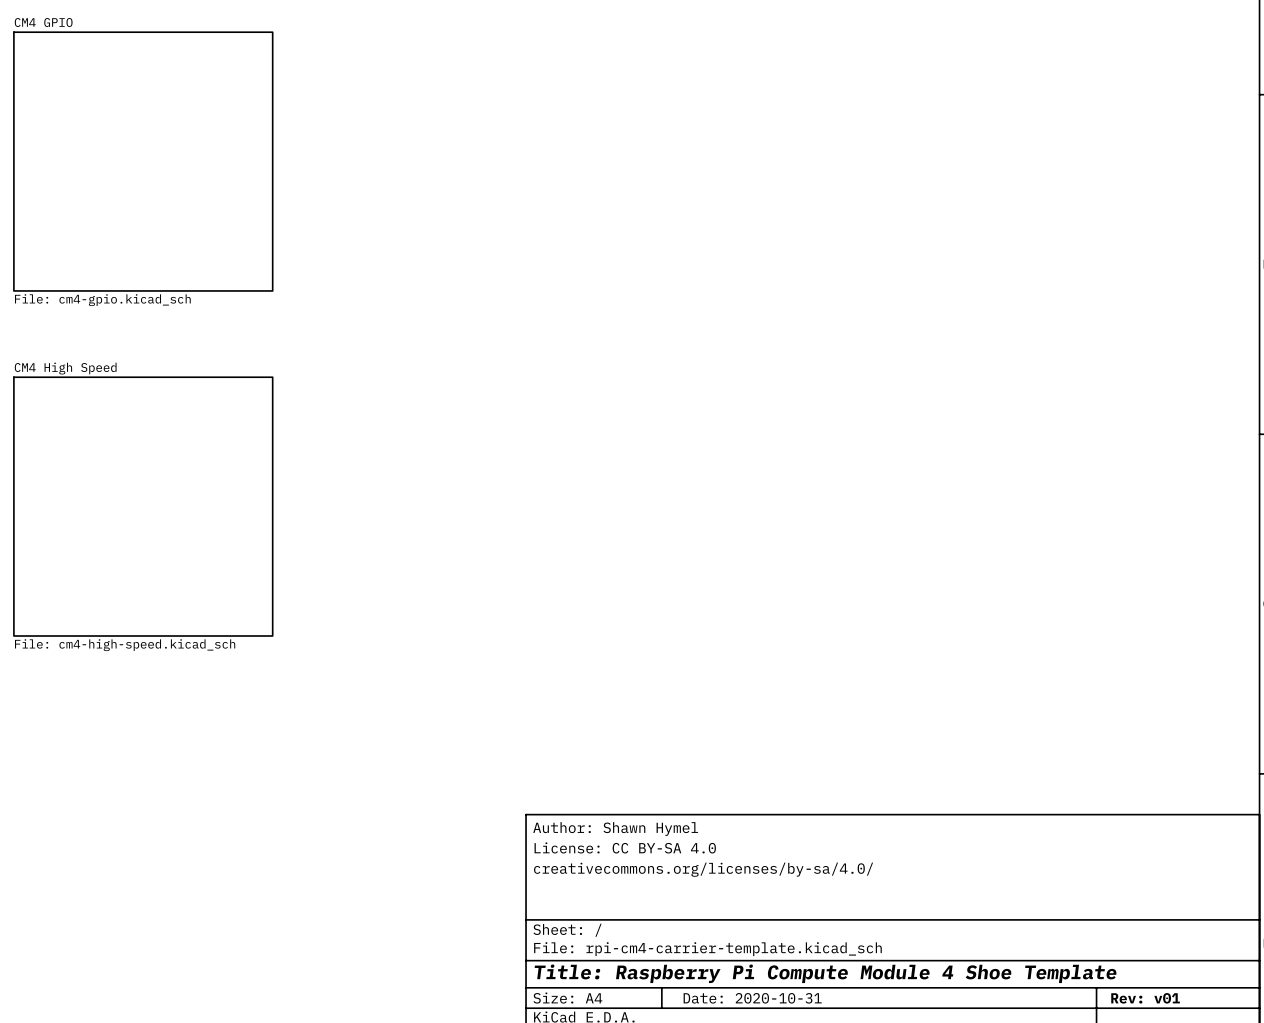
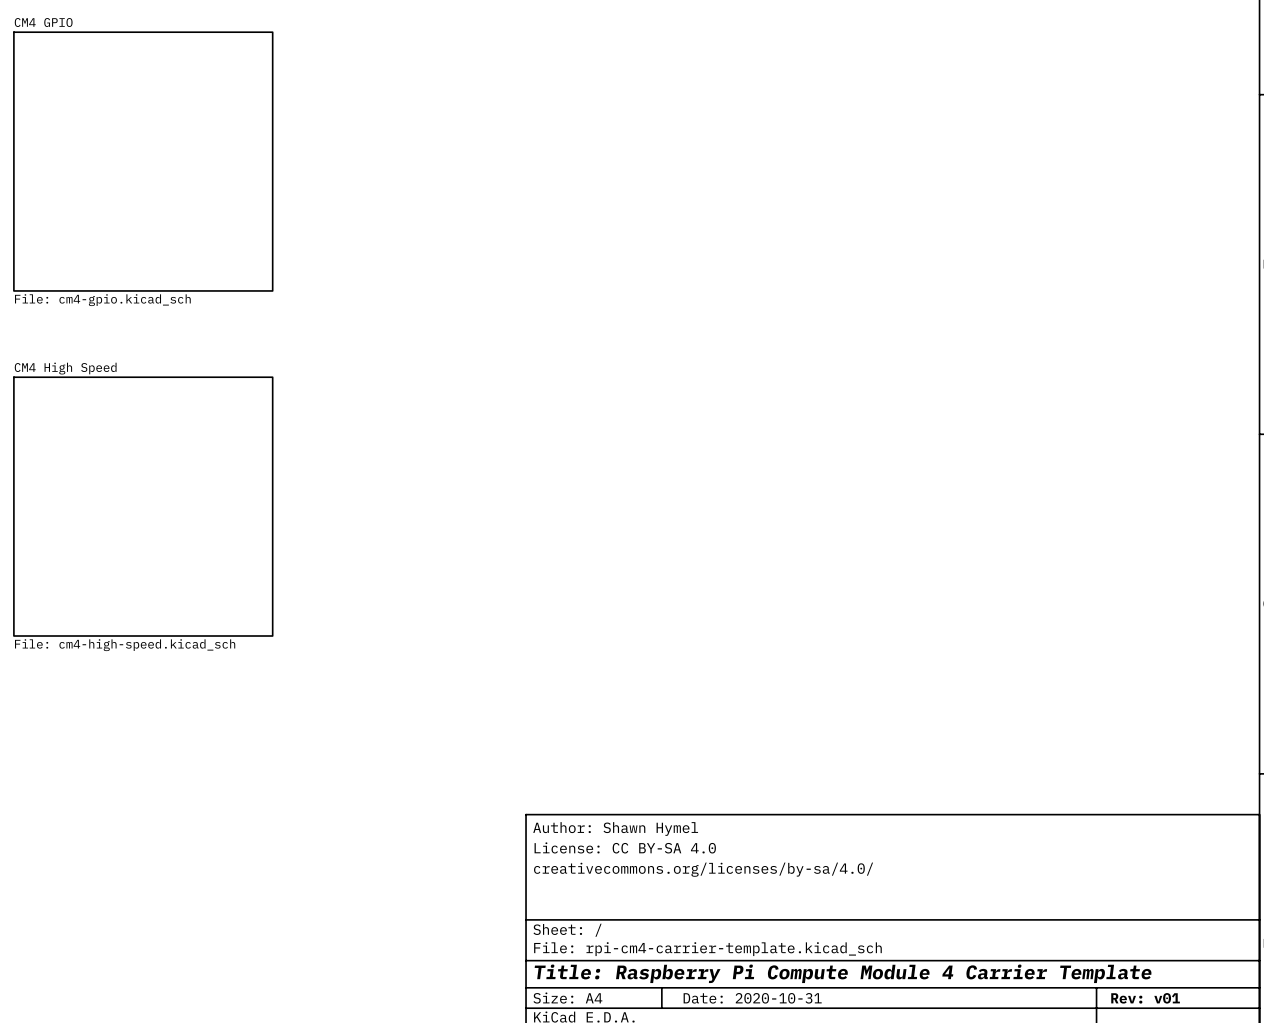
title block: Title: Raspberry Pi Compute Module 4 Shoe Template (825, 973) -> Title: Raspberry Pi Compute Module 4 Carrier Template (843, 973)

